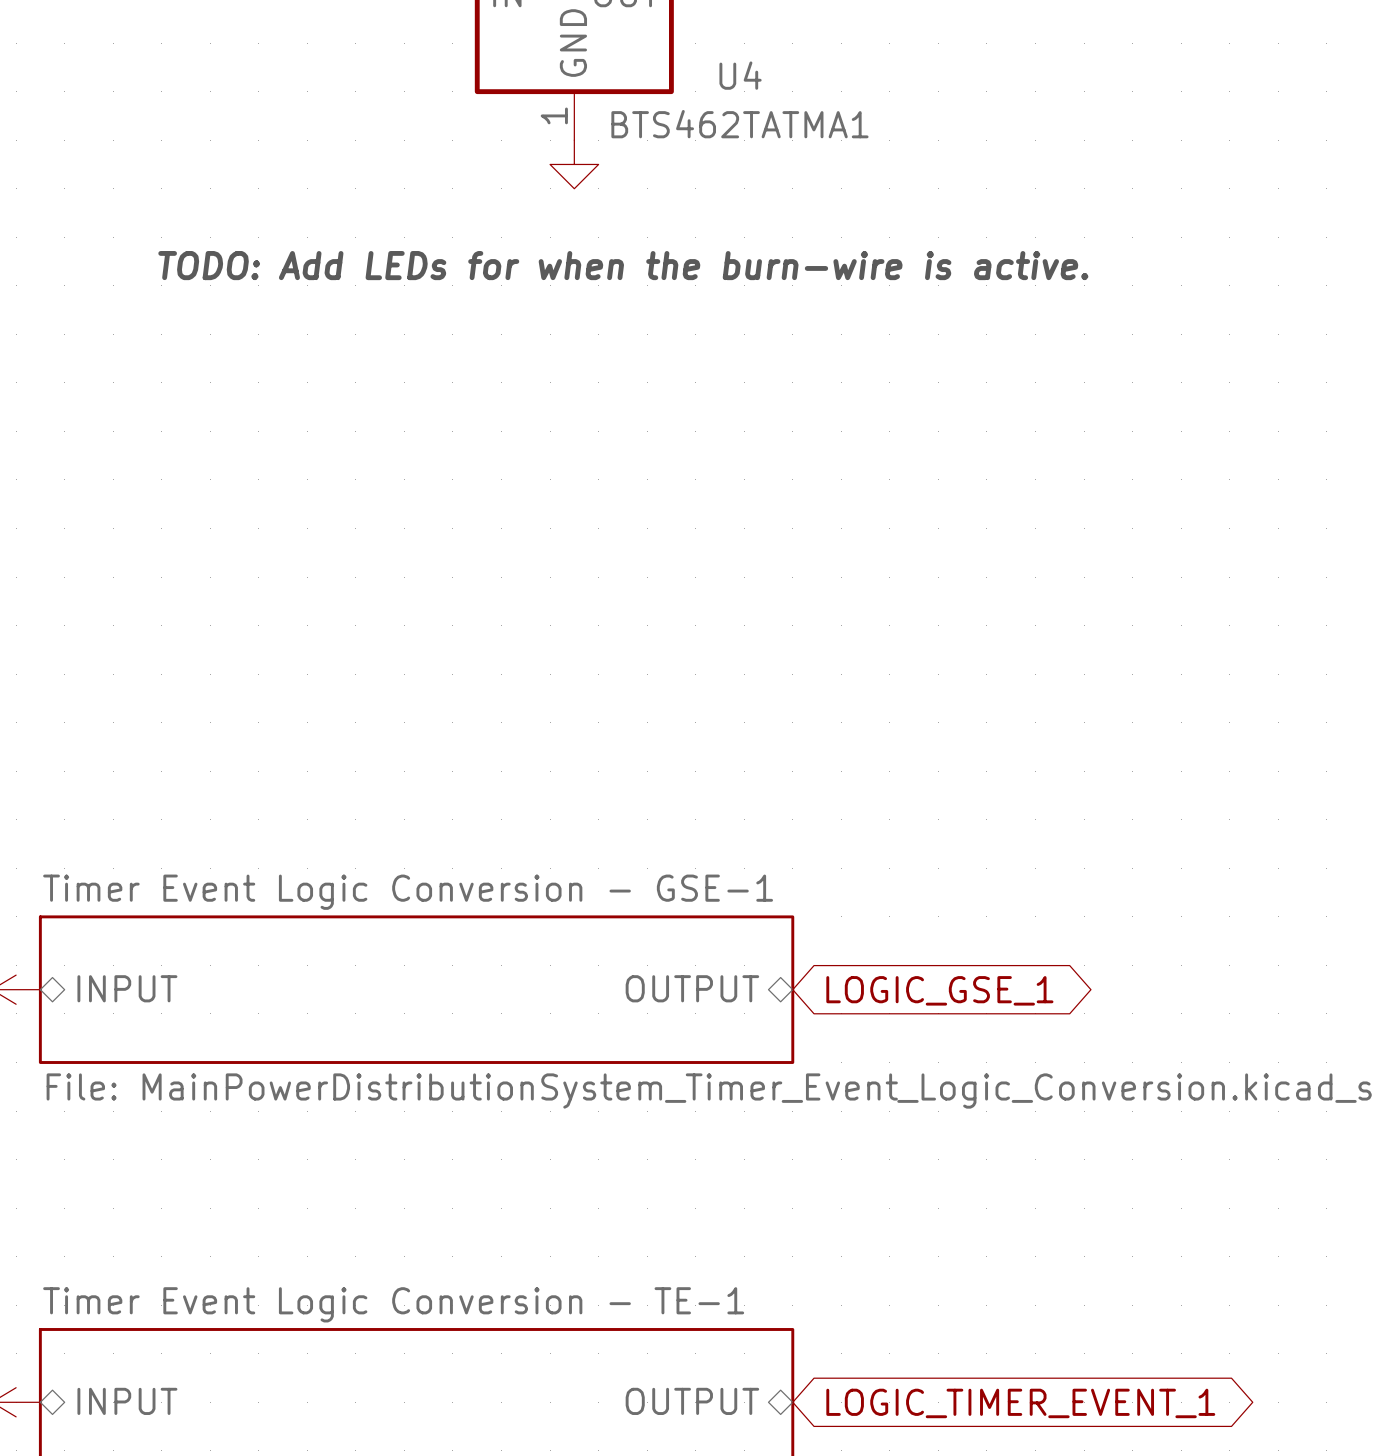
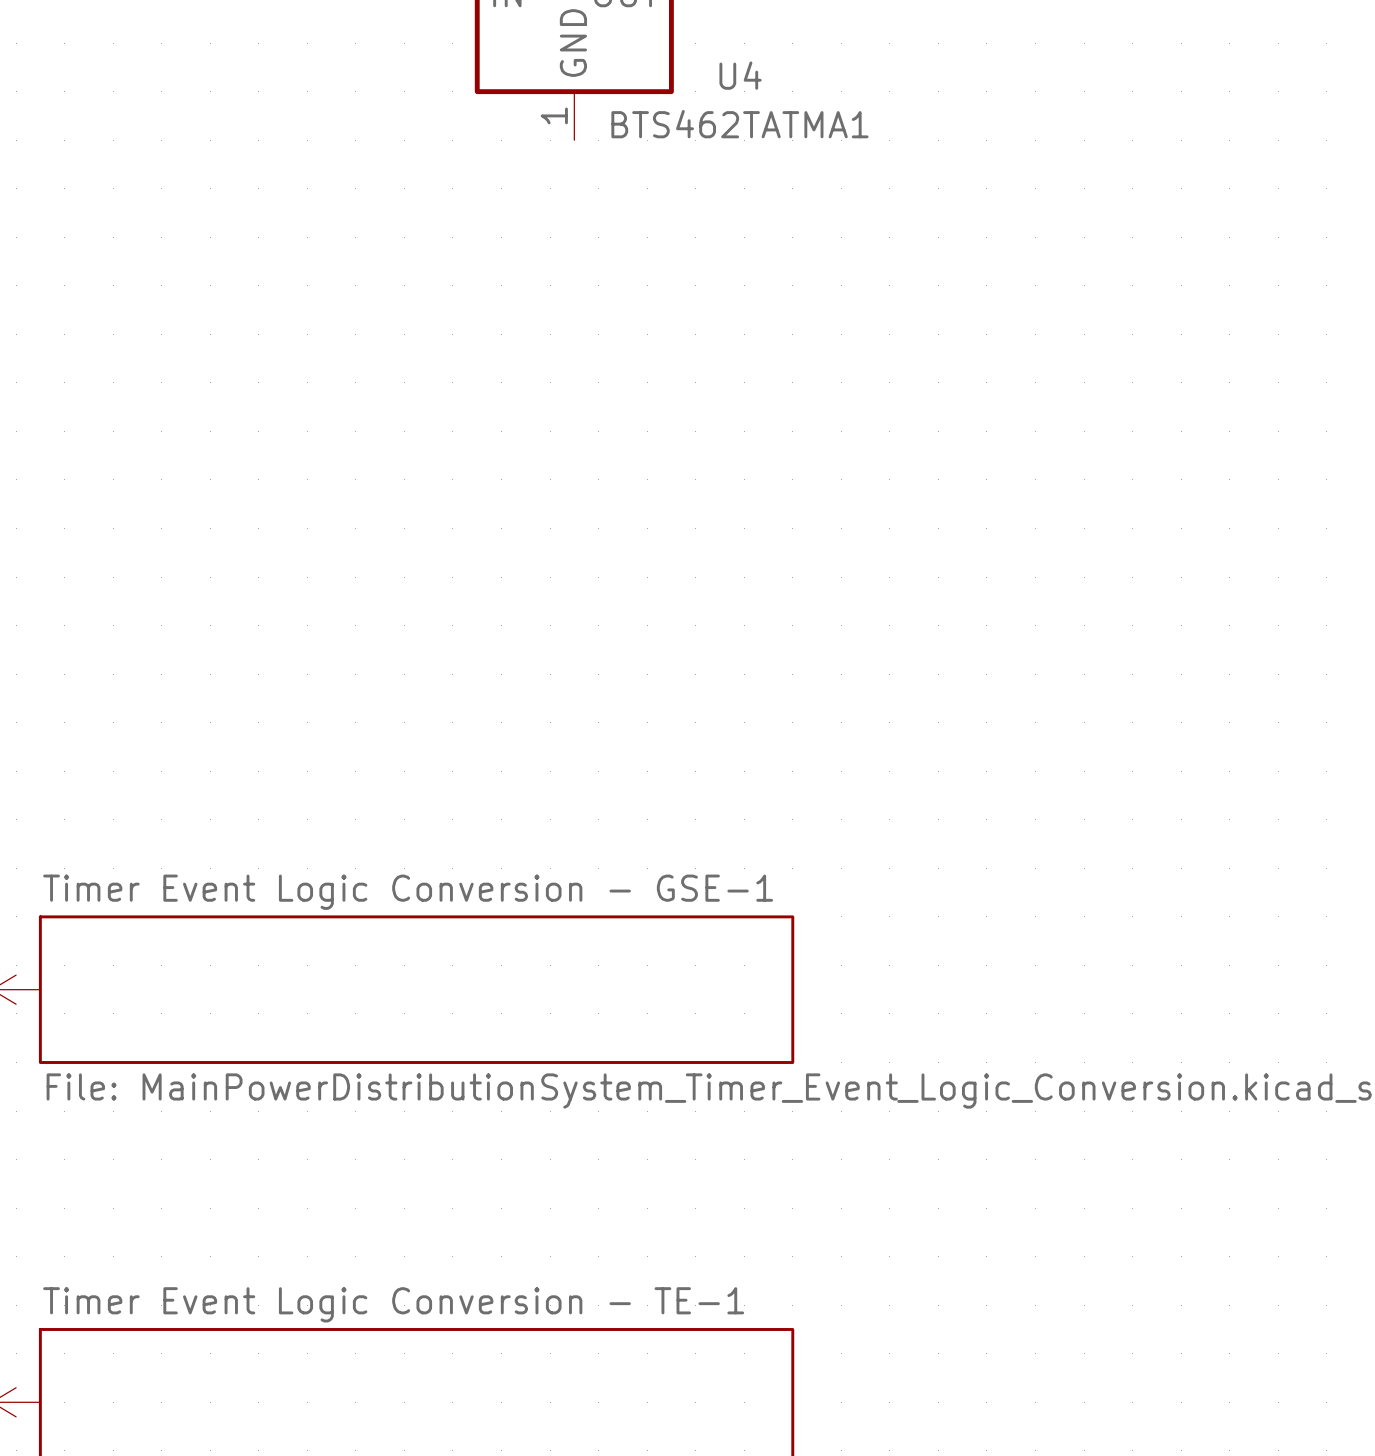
power symbol: (574, 164) -> none
text: TODO: Add LEDs for when the burn-wire is active. (623, 265) -> none
sheet pin: INPUT (127, 988) -> none
sheet pin: OUTPUT (692, 988) -> none
global label: LOGIC_GSE_1 (939, 990) -> none
sheet pin: INPUT (127, 1401) -> none
sheet pin: OUTPUT (692, 1401) -> none
global label: LOGIC_TIMER_EVENT_1 (1020, 1403) -> none

